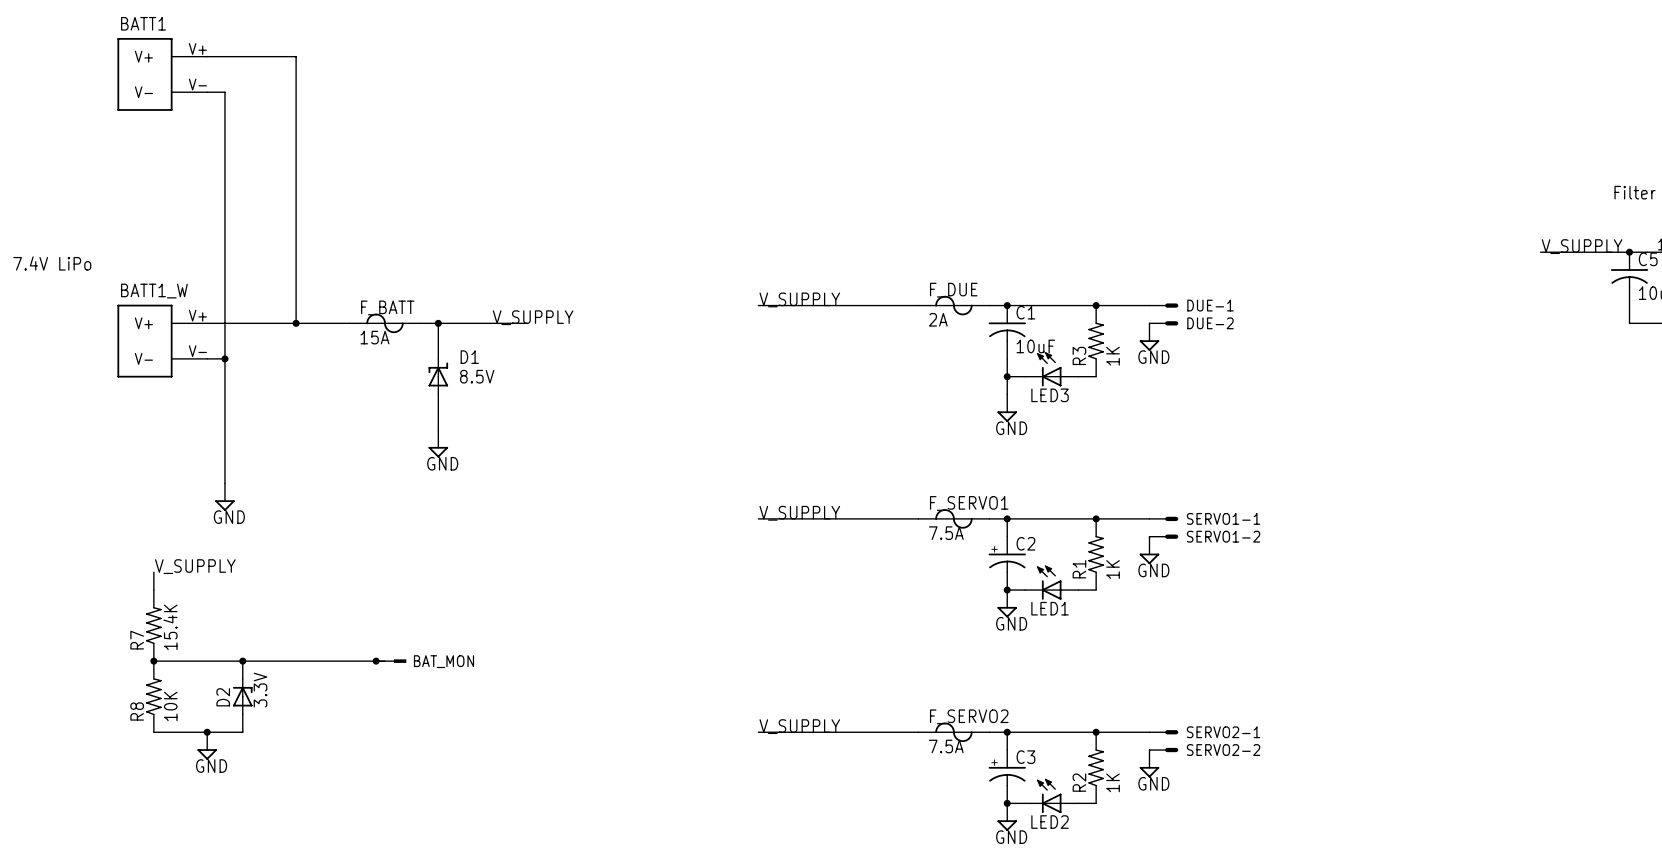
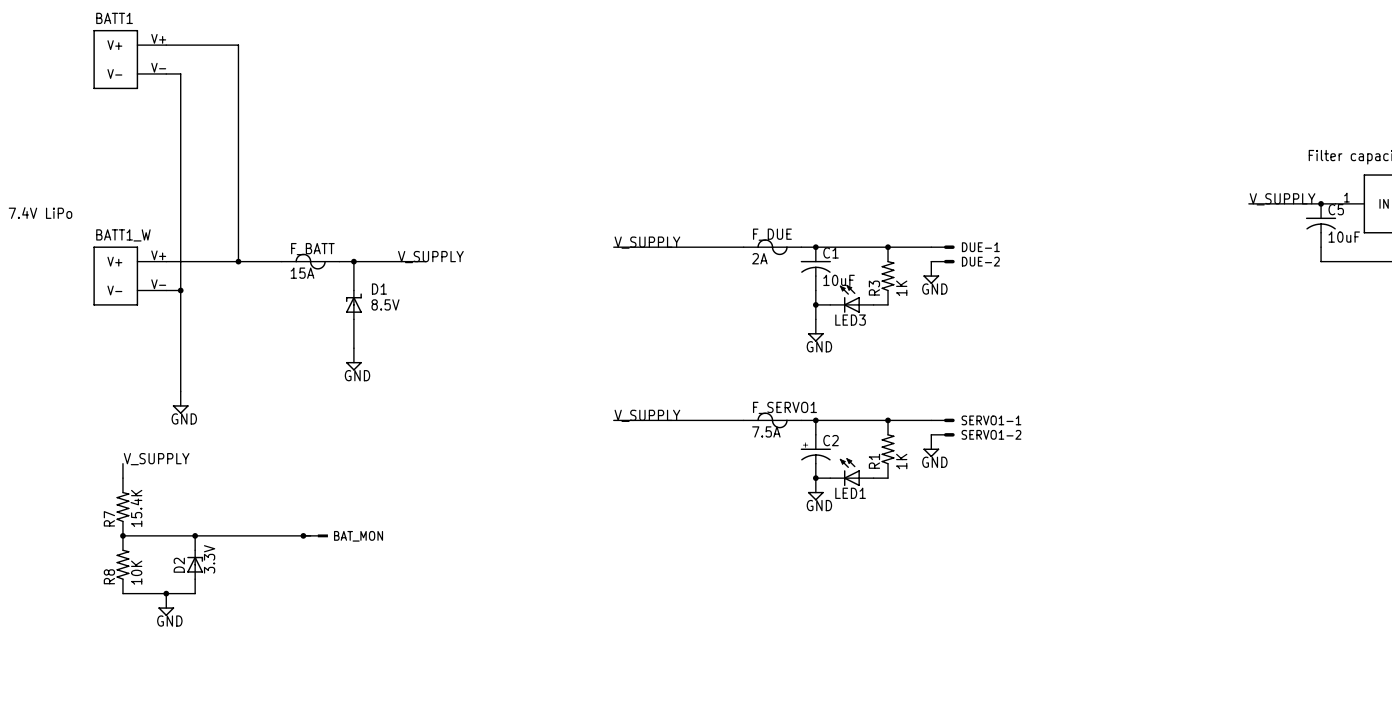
label: V_SUPPLY (799, 726) -> none
wire: (758, 732) (918, 732) -> none
F_SERVO2: 7.5A (953, 732) -> none
wire: (989, 732) (1149, 732) -> none
wire: (1007, 732) (1007, 750) -> none
junction: (1007, 732) -> none
junction: (1096, 732) -> none
SERVO2-1: (1163, 732) -> none
SERVO2-2: (1163, 750) -> none
power symbol: GND (1149, 763) -> none
R2: 1K (1096, 767) -> none
C3: (1007, 776) -> none
LED2: (1051, 795) -> none
wire: (1007, 803) (1025, 803) -> none
junction: (1007, 803) -> none
wire: (1078, 803) (1096, 803) -> none
power symbol: GND (1007, 817) -> none

